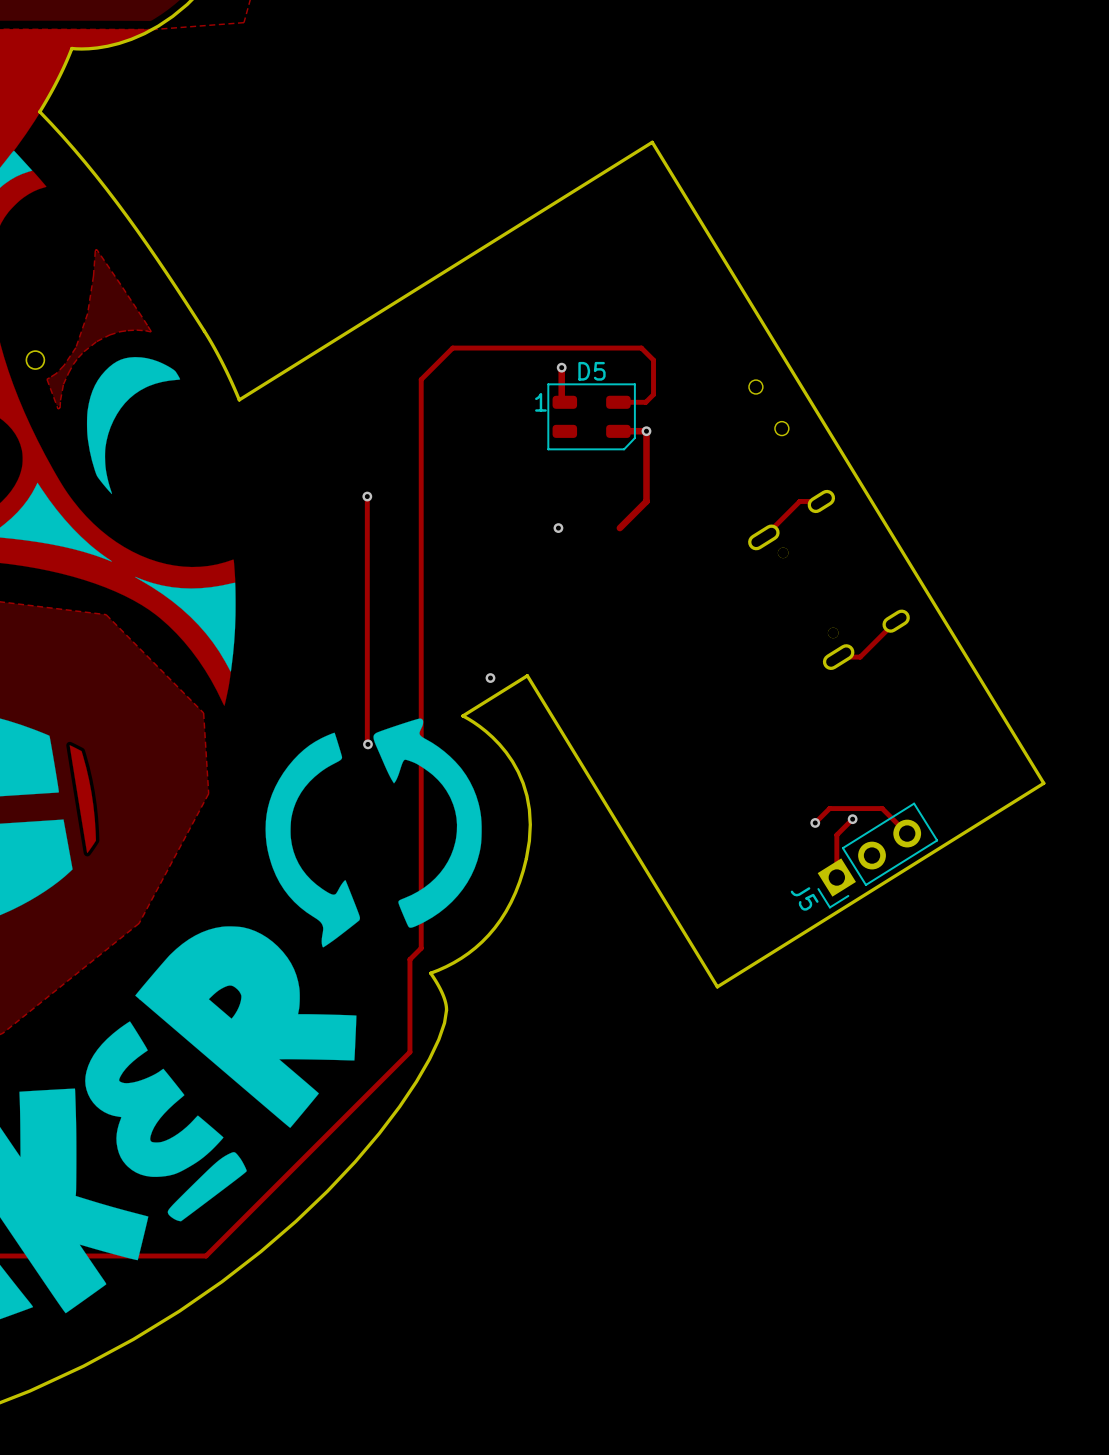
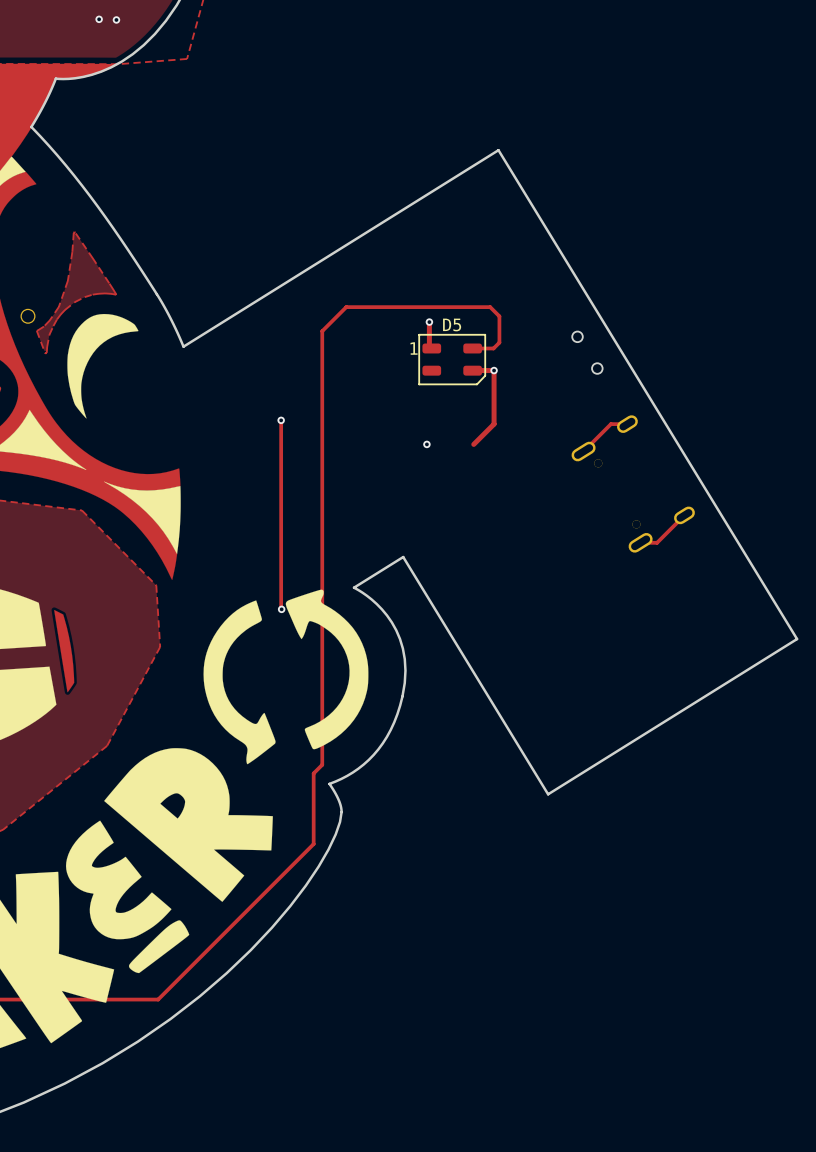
via: (490, 678) -> none
track: (852, 819) (836, 835) (836, 877) -> none
via: (852, 819) -> none
track: (815, 822) (829, 808) (882, 808) (907, 833) -> none
via: (815, 822) -> none
J5: (877, 855) -> none

